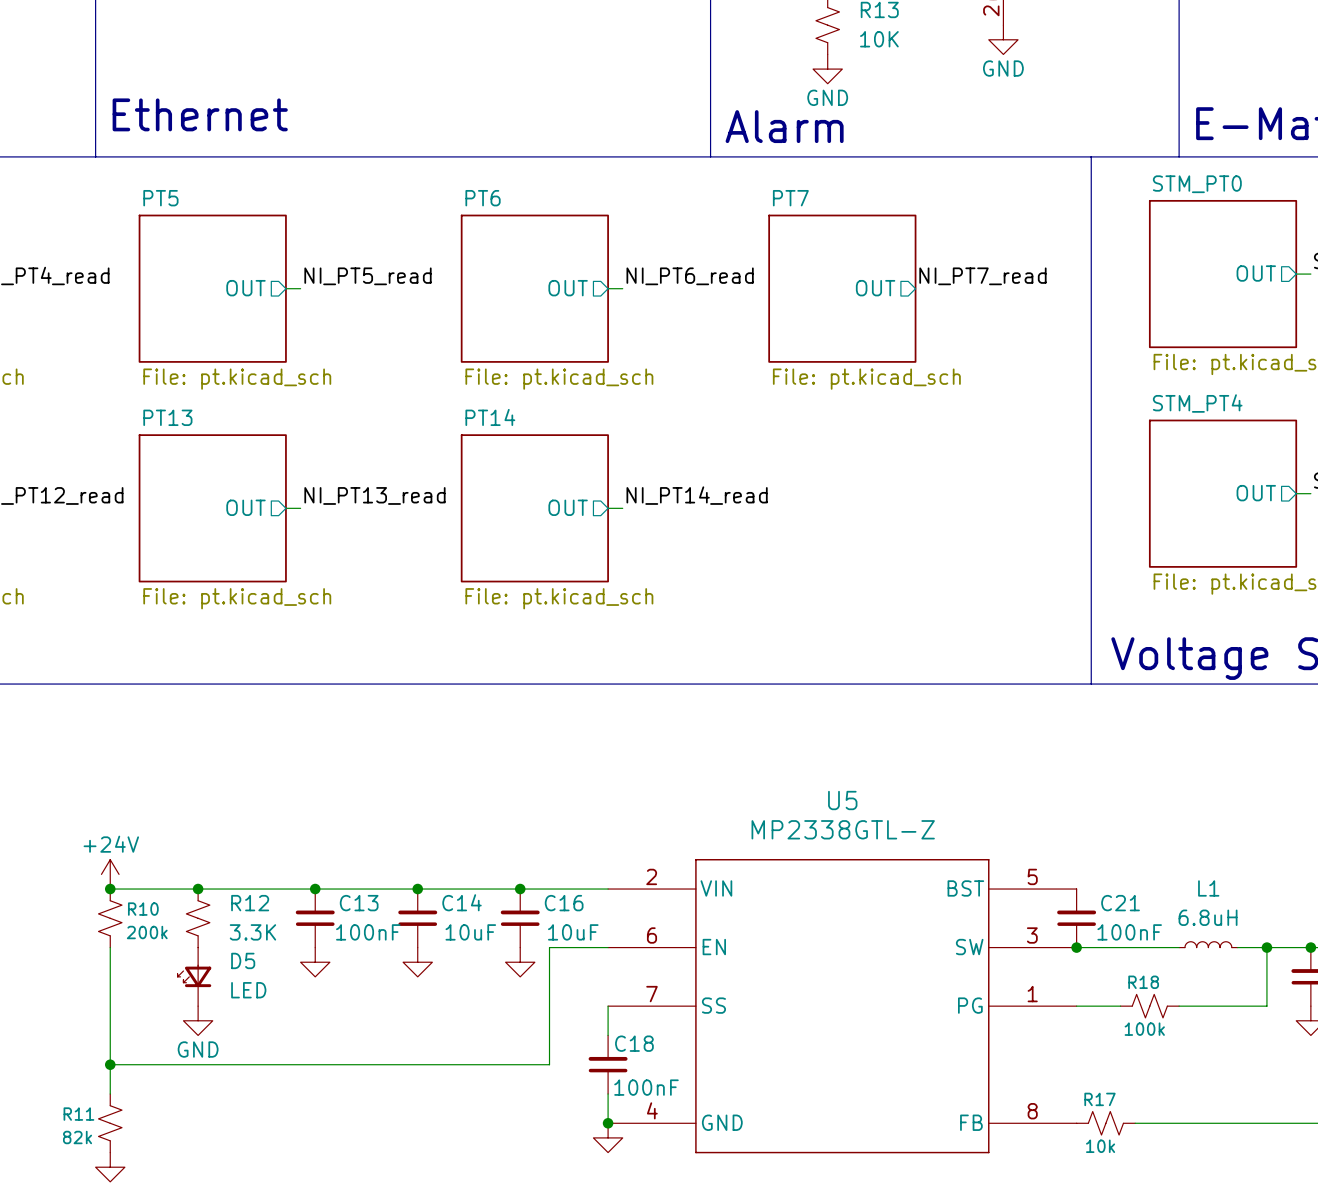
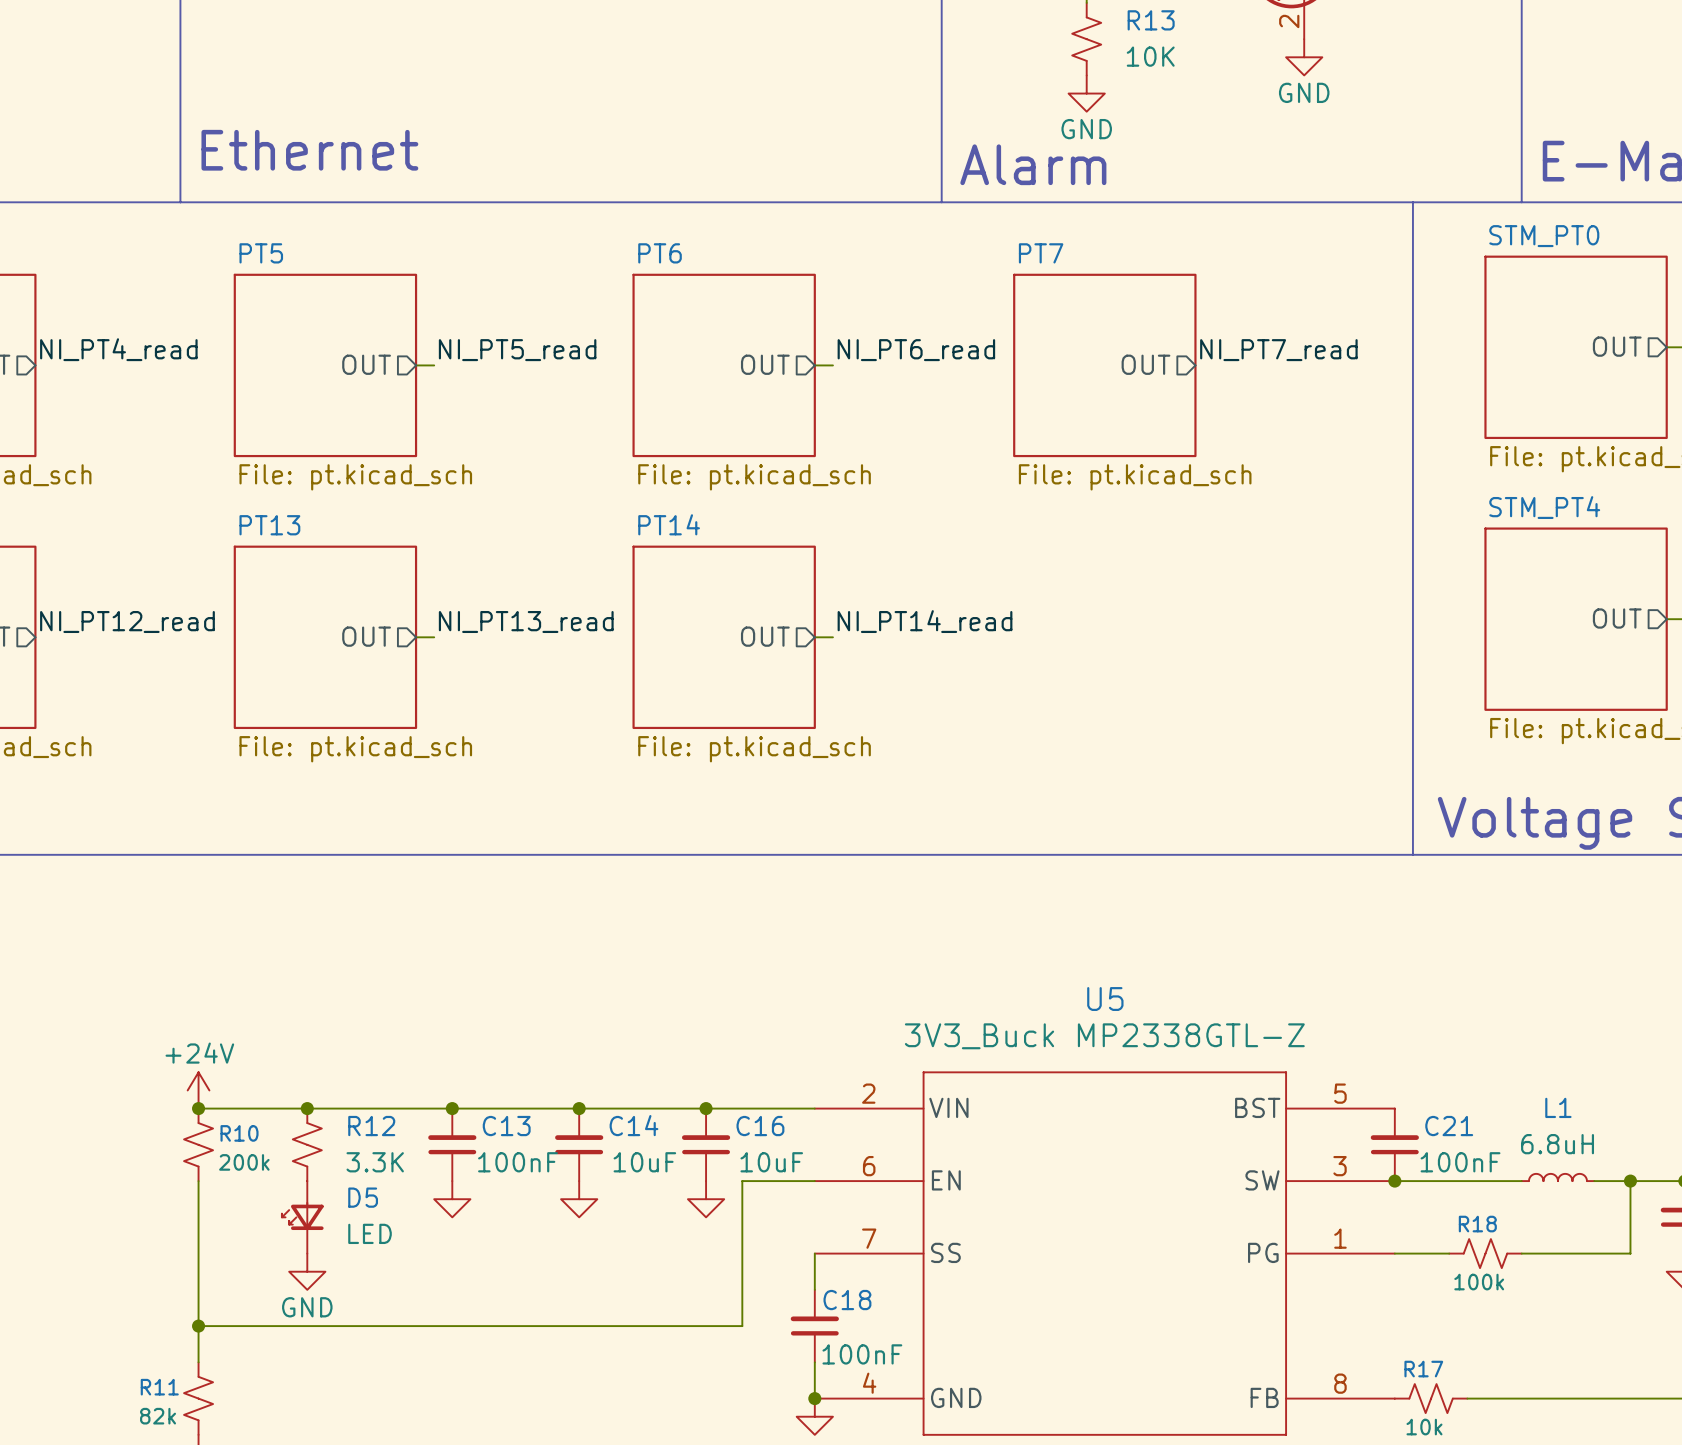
U5 value: MP2338GTL-Z (843, 829) -> 3V3_Buck MP2338GTL-Z (1104, 1036)

